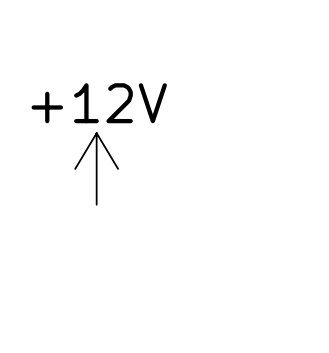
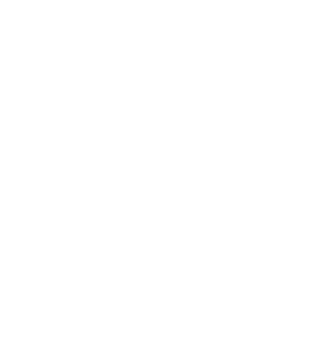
power symbol: +12V (96, 168) -> none

